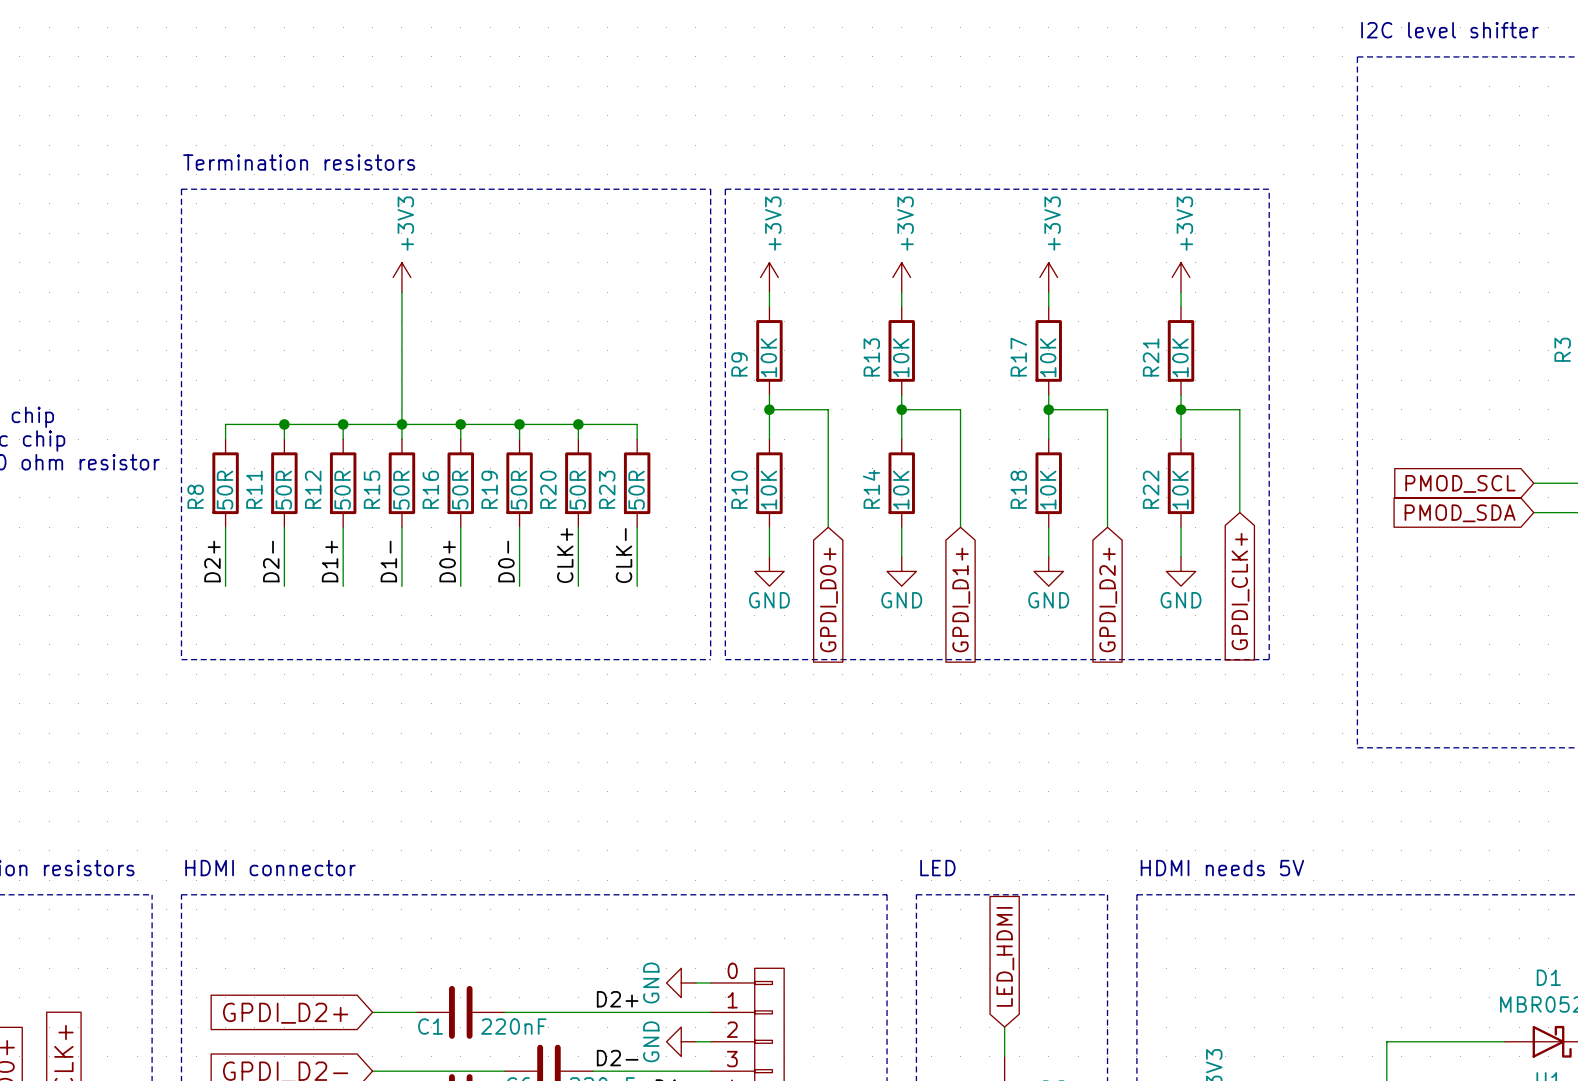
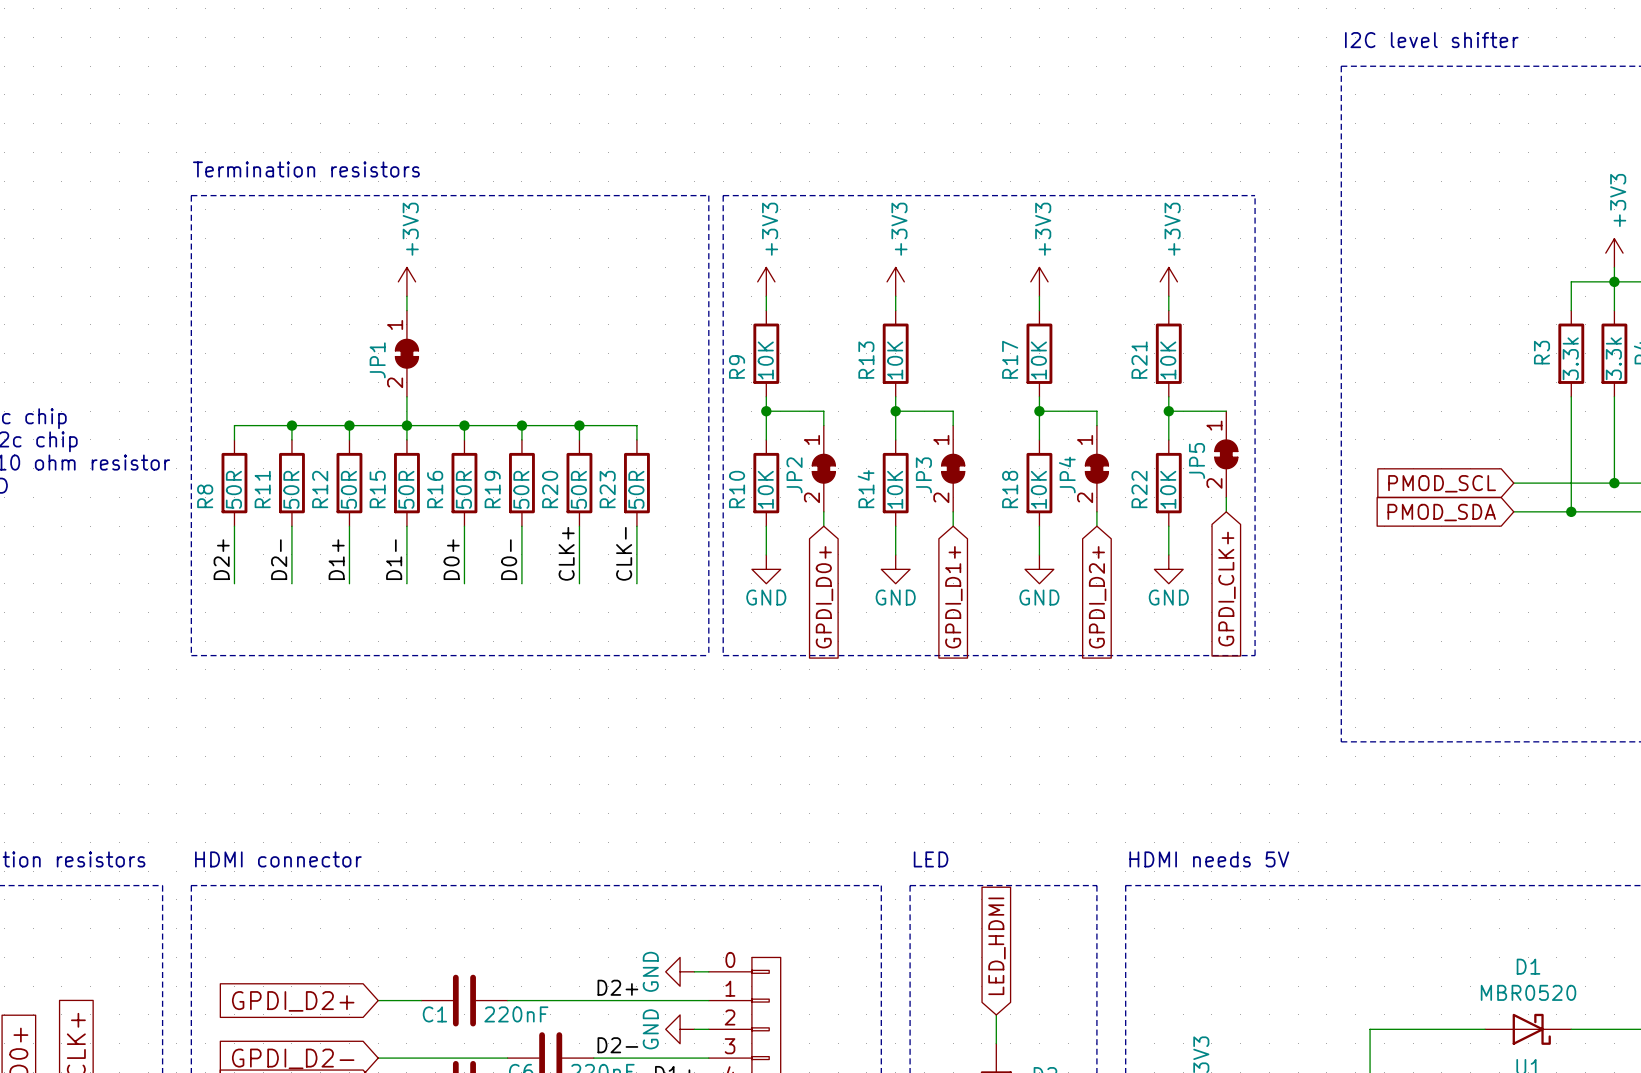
JP1: none -> (406, 353)
JP5: none -> (1226, 454)
JP2: none -> (823, 468)
JP3: none -> (953, 468)
JP4: none -> (1096, 468)

